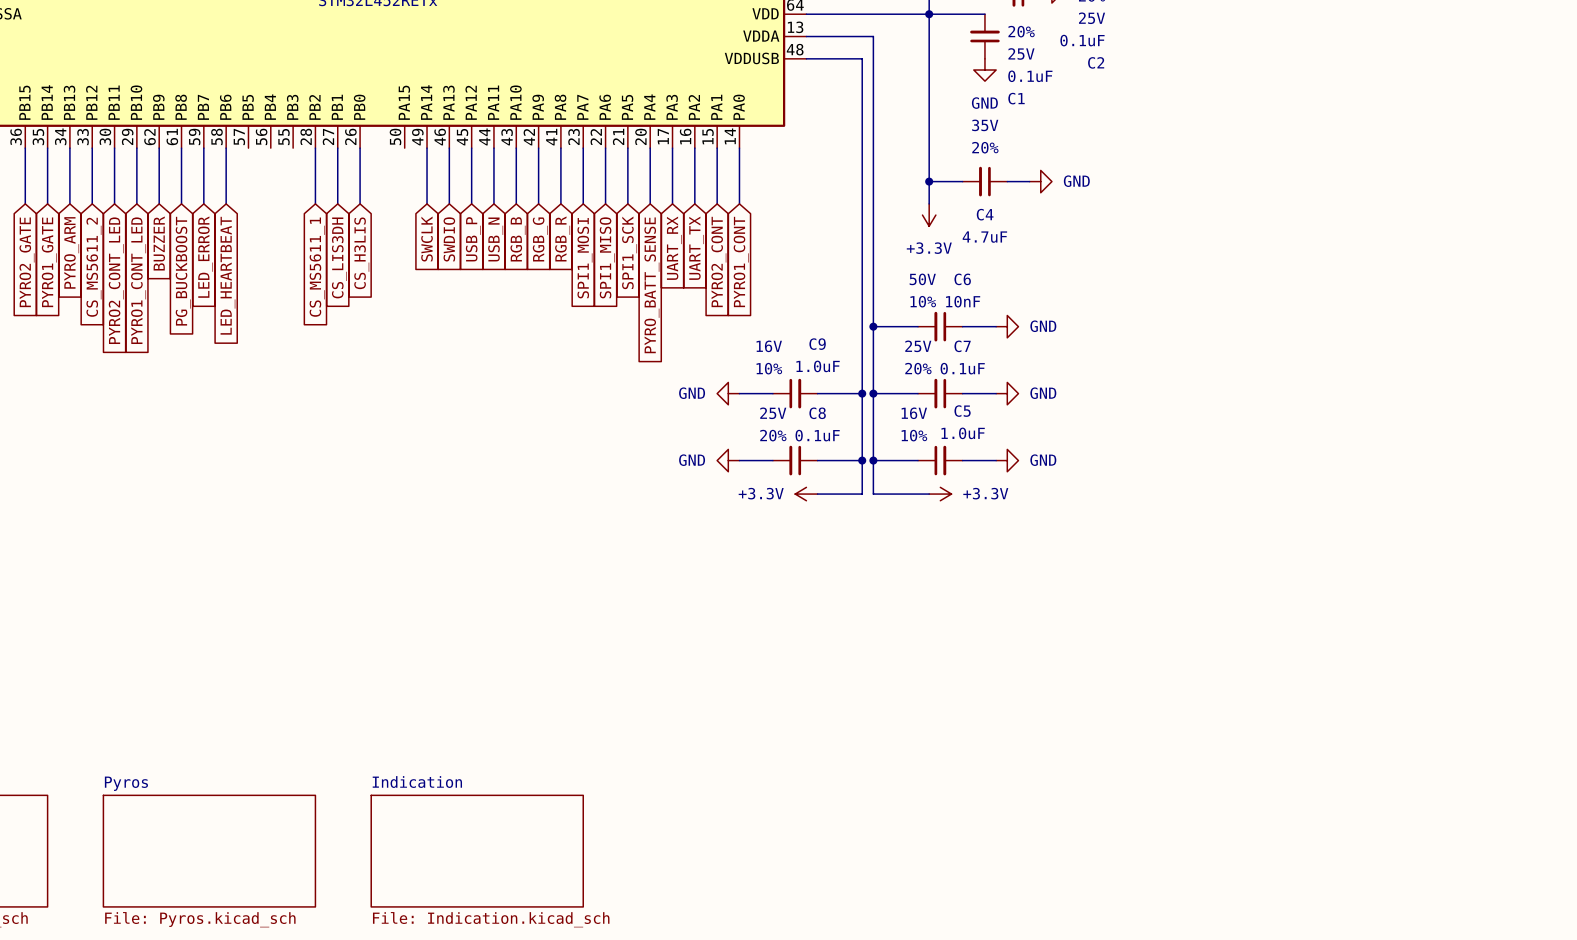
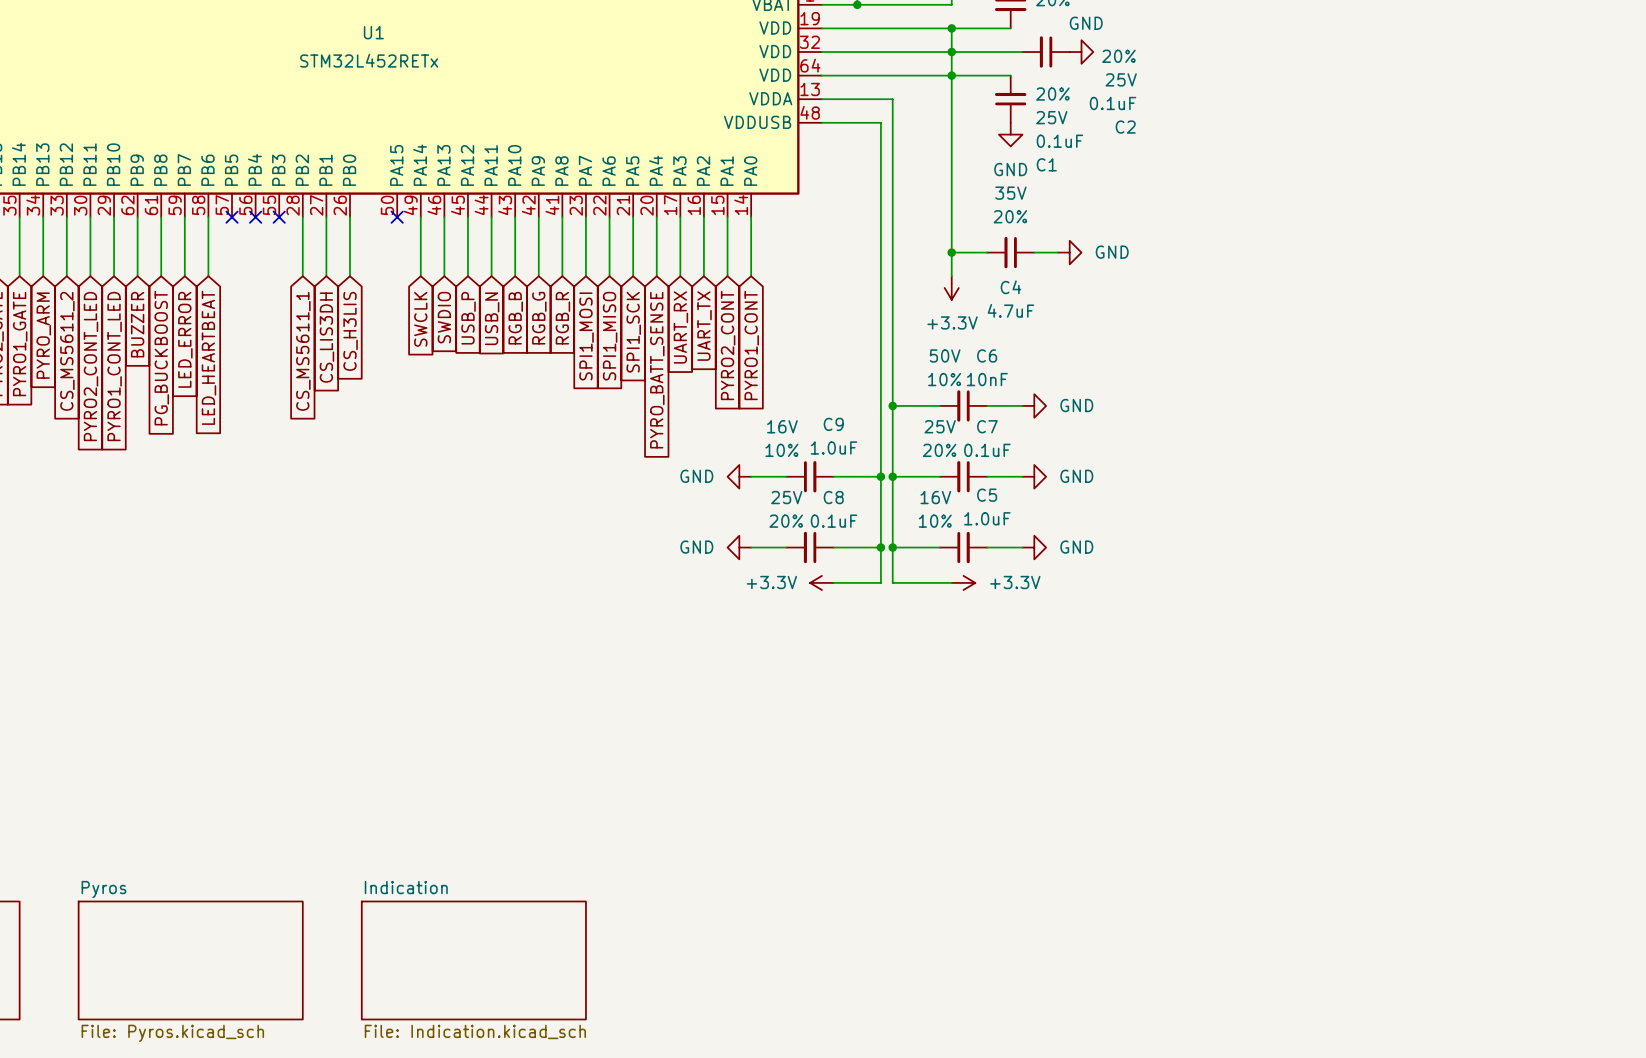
no-connect mark: none -> (232, 217)
no-connect mark: none -> (255, 217)
no-connect mark: none -> (279, 217)
no-connect mark: none -> (397, 217)

